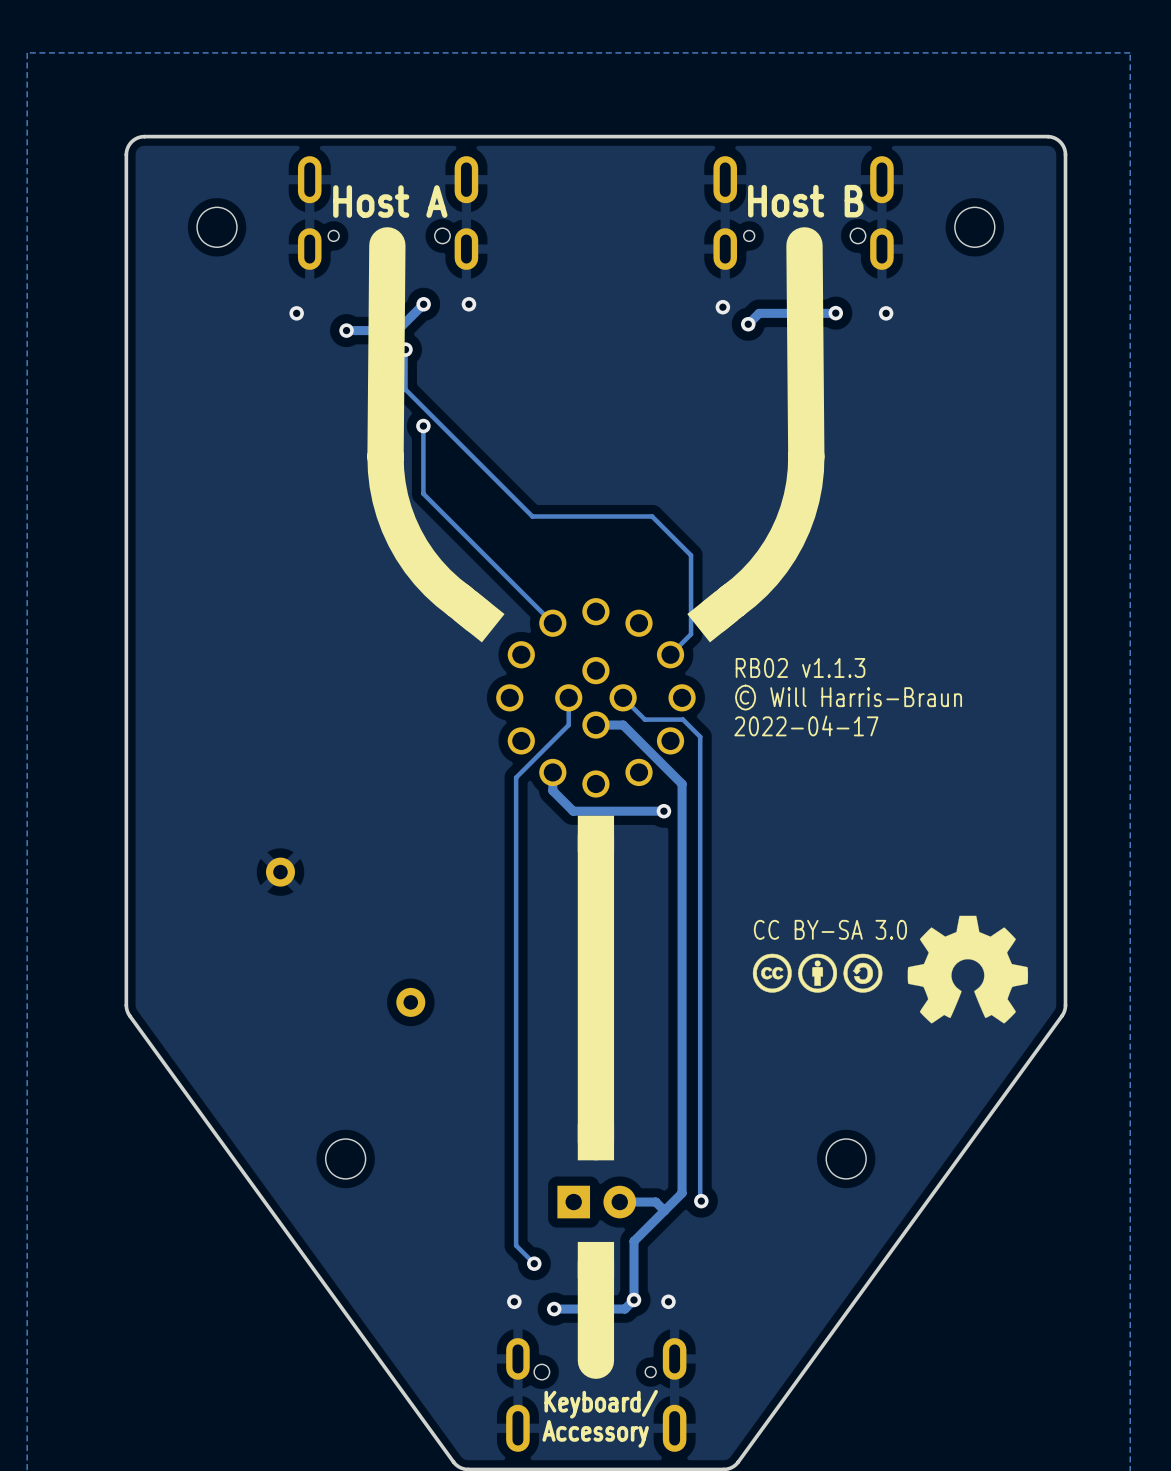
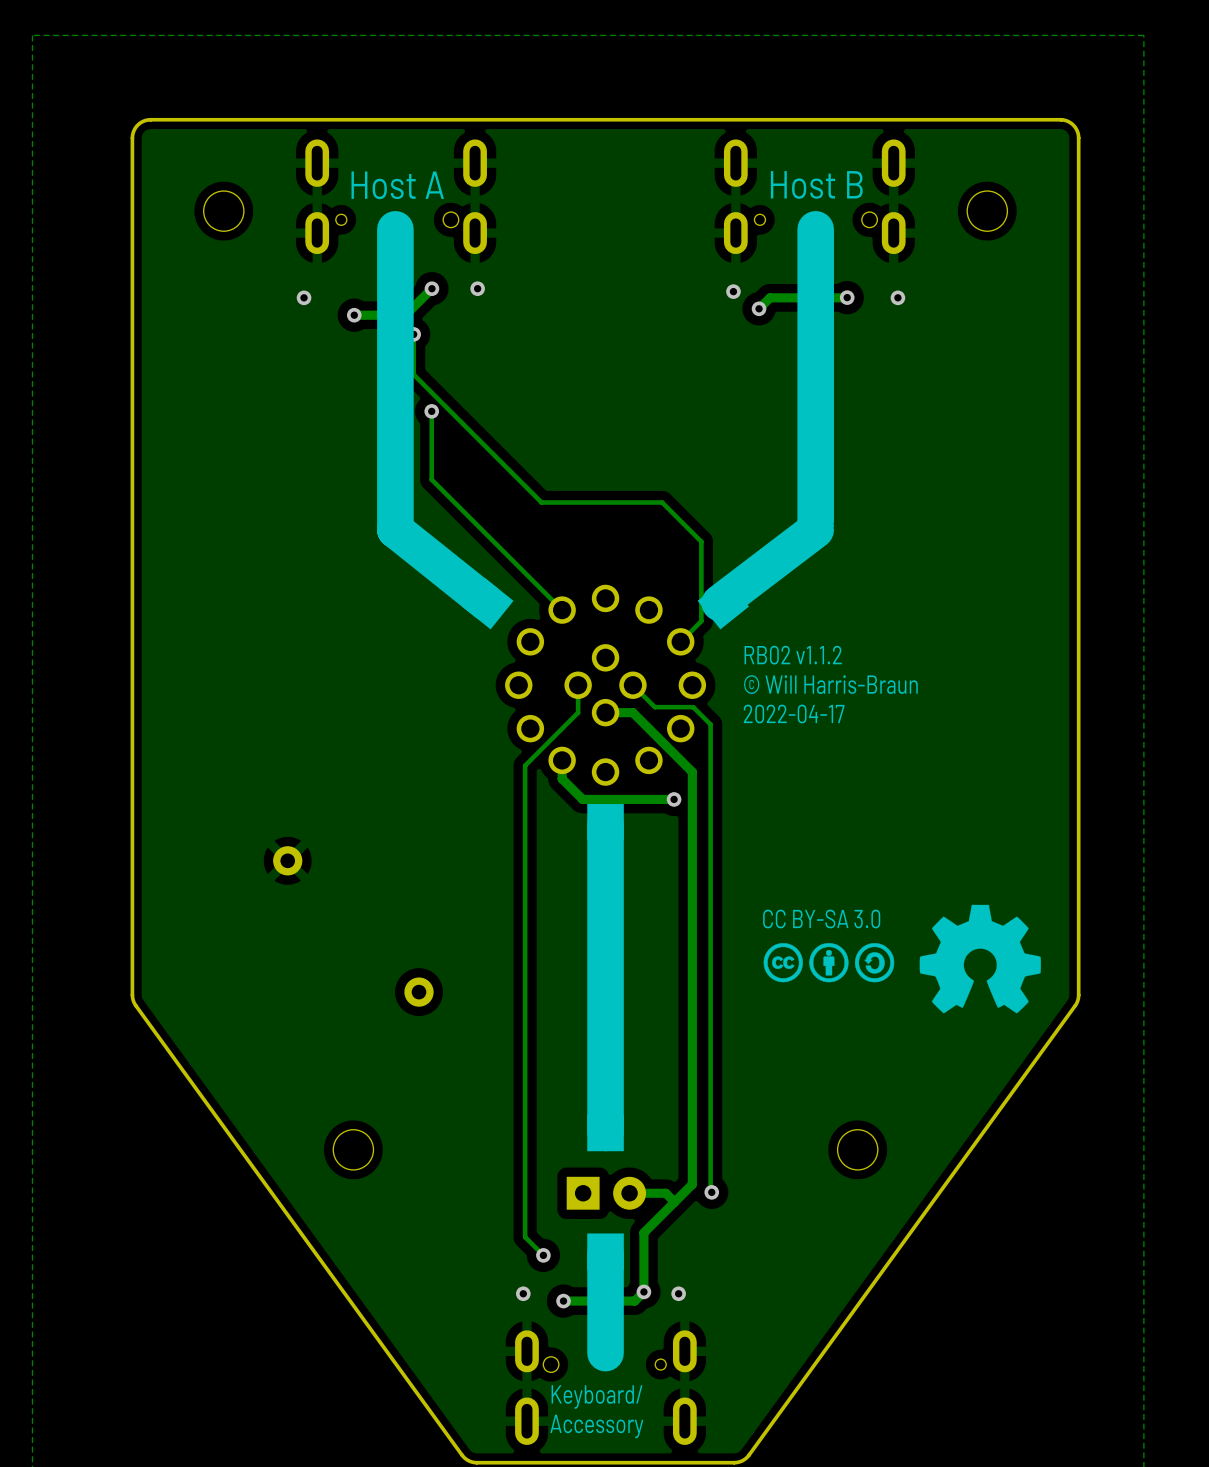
line: (387, 245) (385, 456) (390, 498) (398, 524) (419, 561) (437, 582) (478, 616) -> (395, 229) (395, 529) (486, 603)
line: (804, 245) (806, 456) (801, 498) (787, 537) (772, 561) (754, 582) (713, 616) -> (815, 229) (815, 521)
line: none -> (815, 529) (719, 603)
text: RB02 v1.1.3 (800, 667) -> RB02 v1.1.2 (793, 655)

